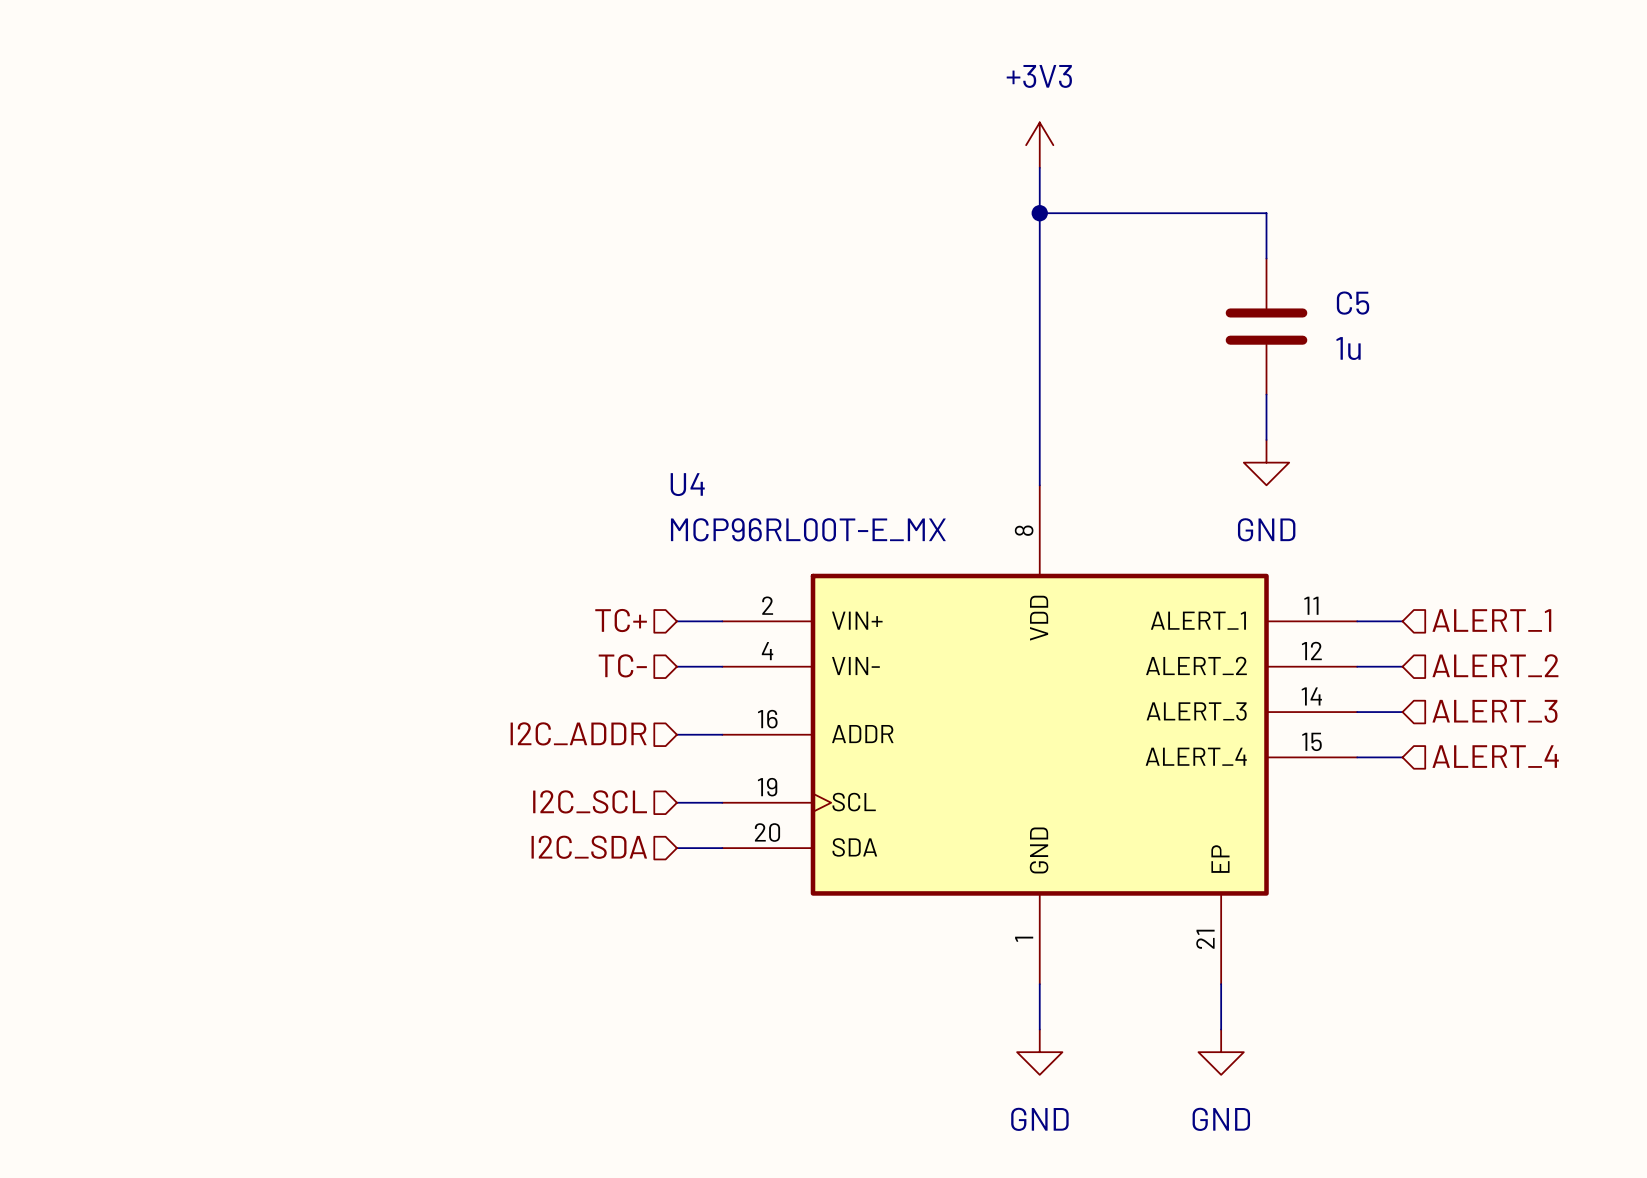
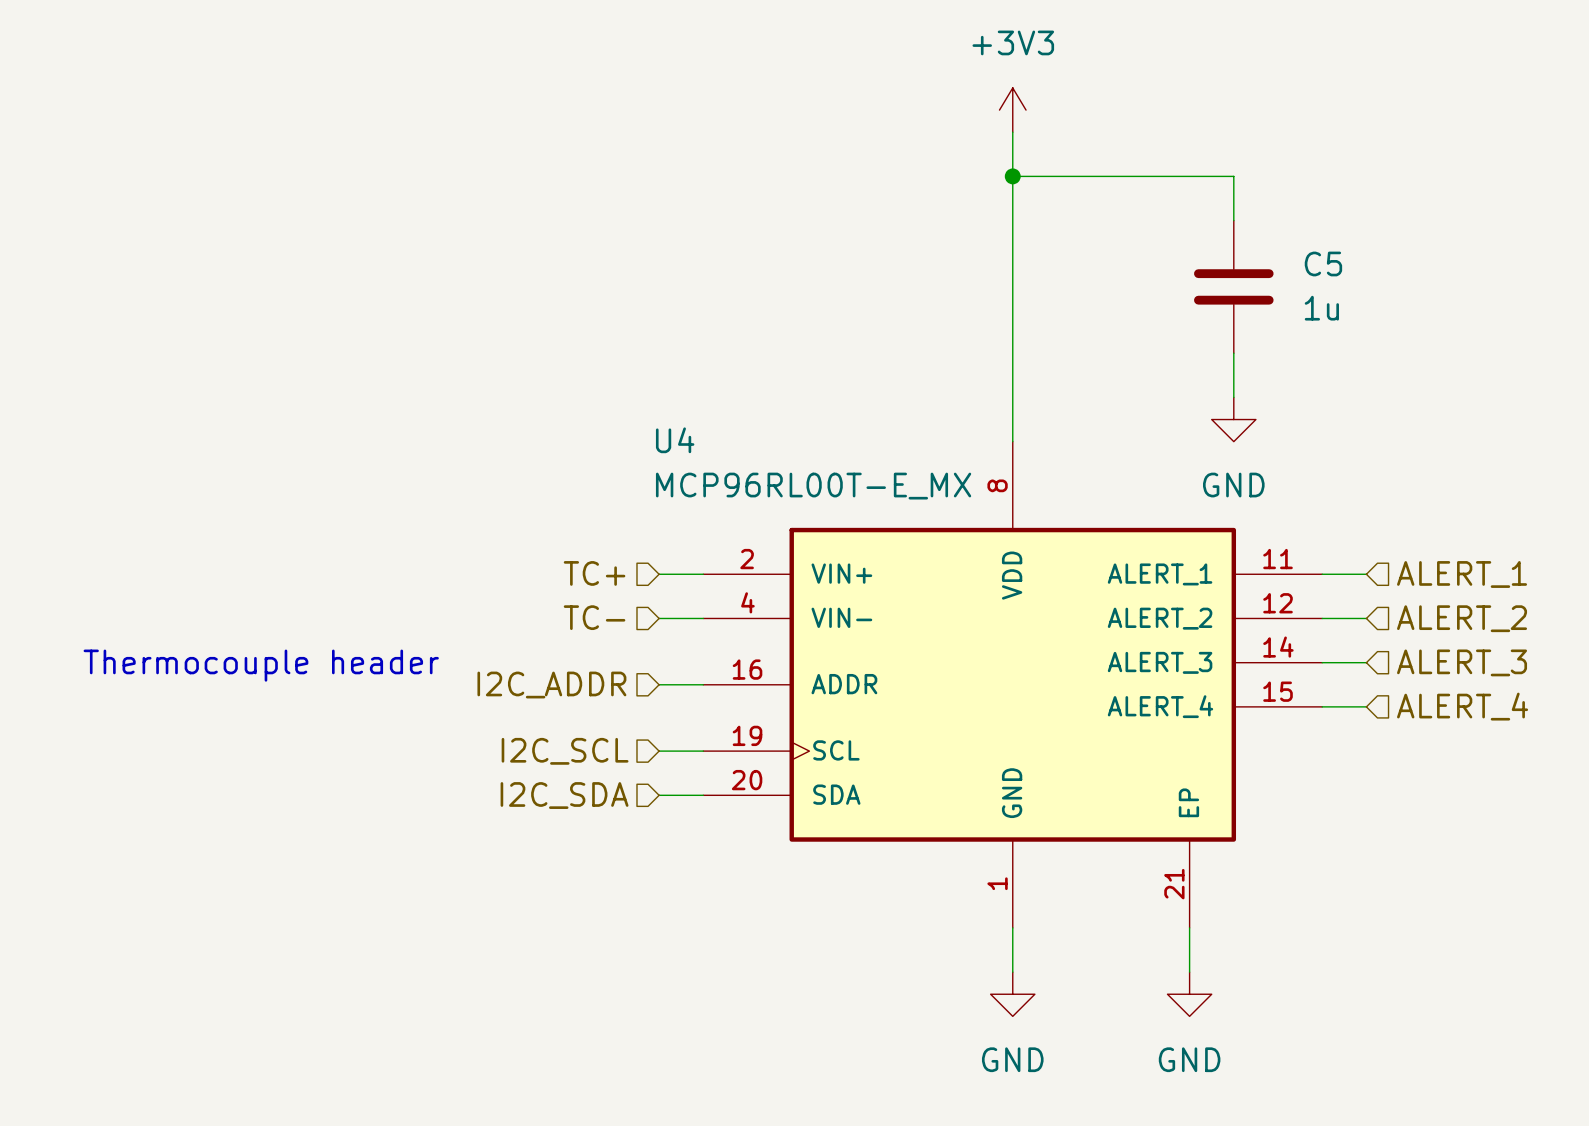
text: none -> Thermocouple header (261, 665)

